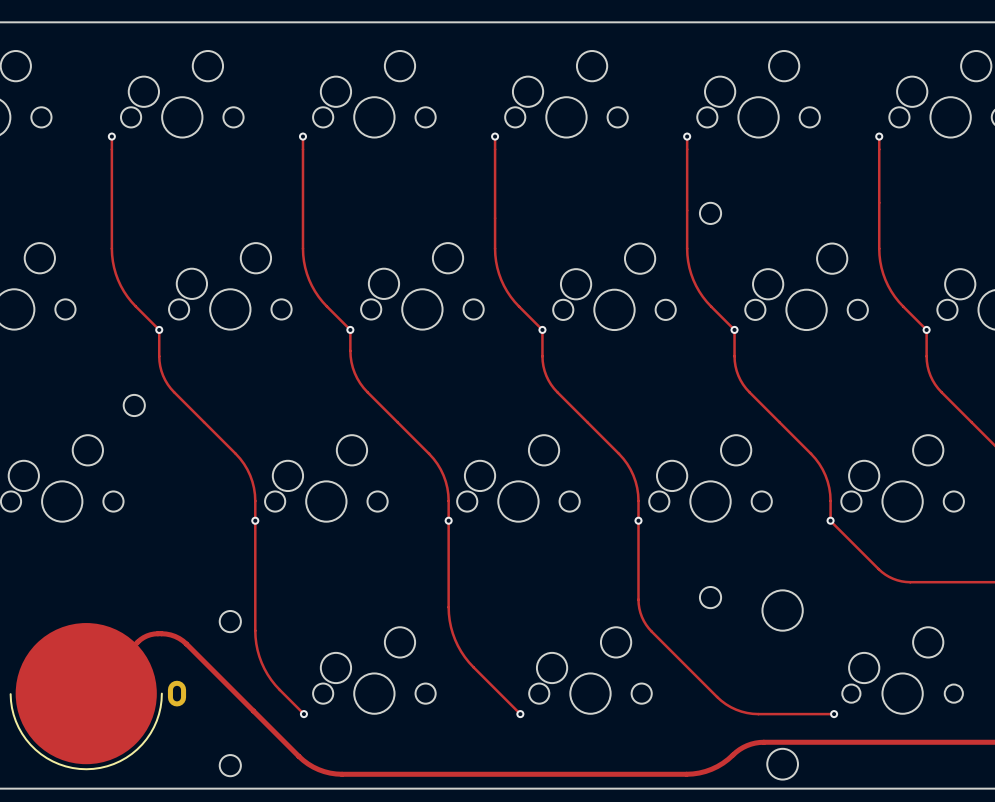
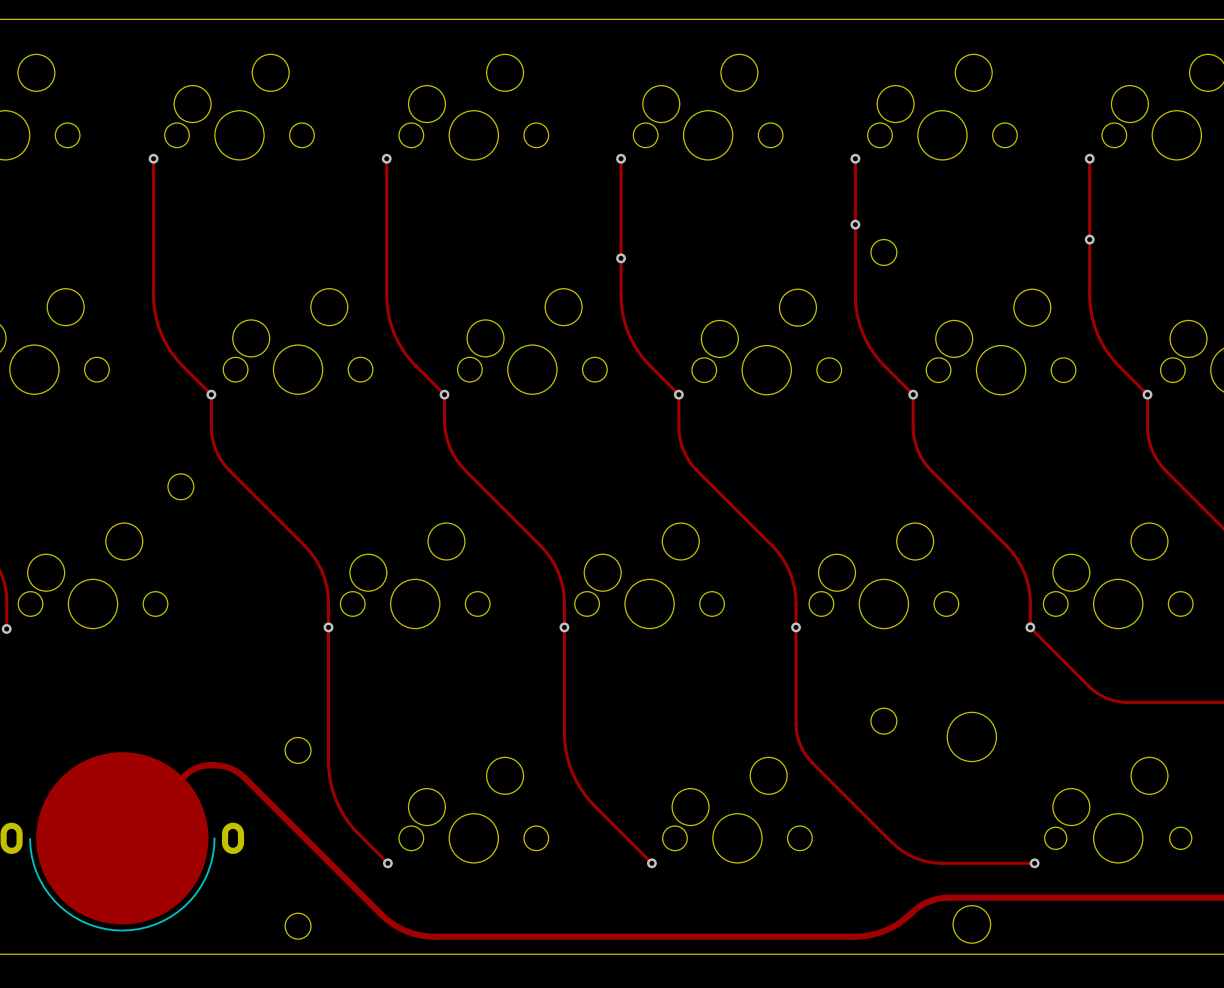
via: none -> (855, 224)
via: none -> (1089, 239)
via: none -> (621, 258)

